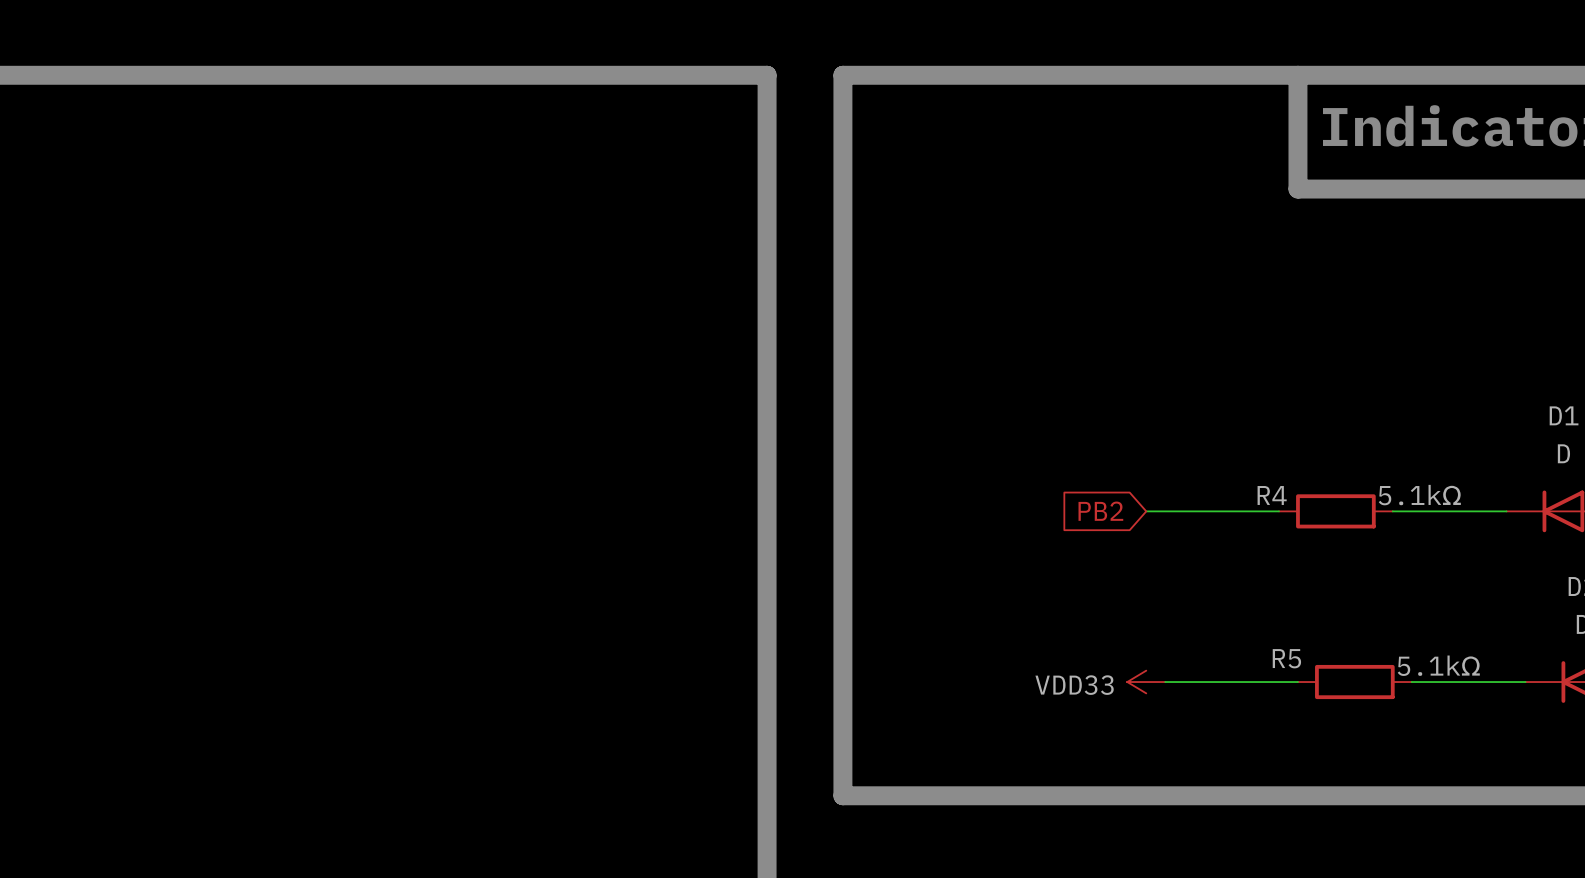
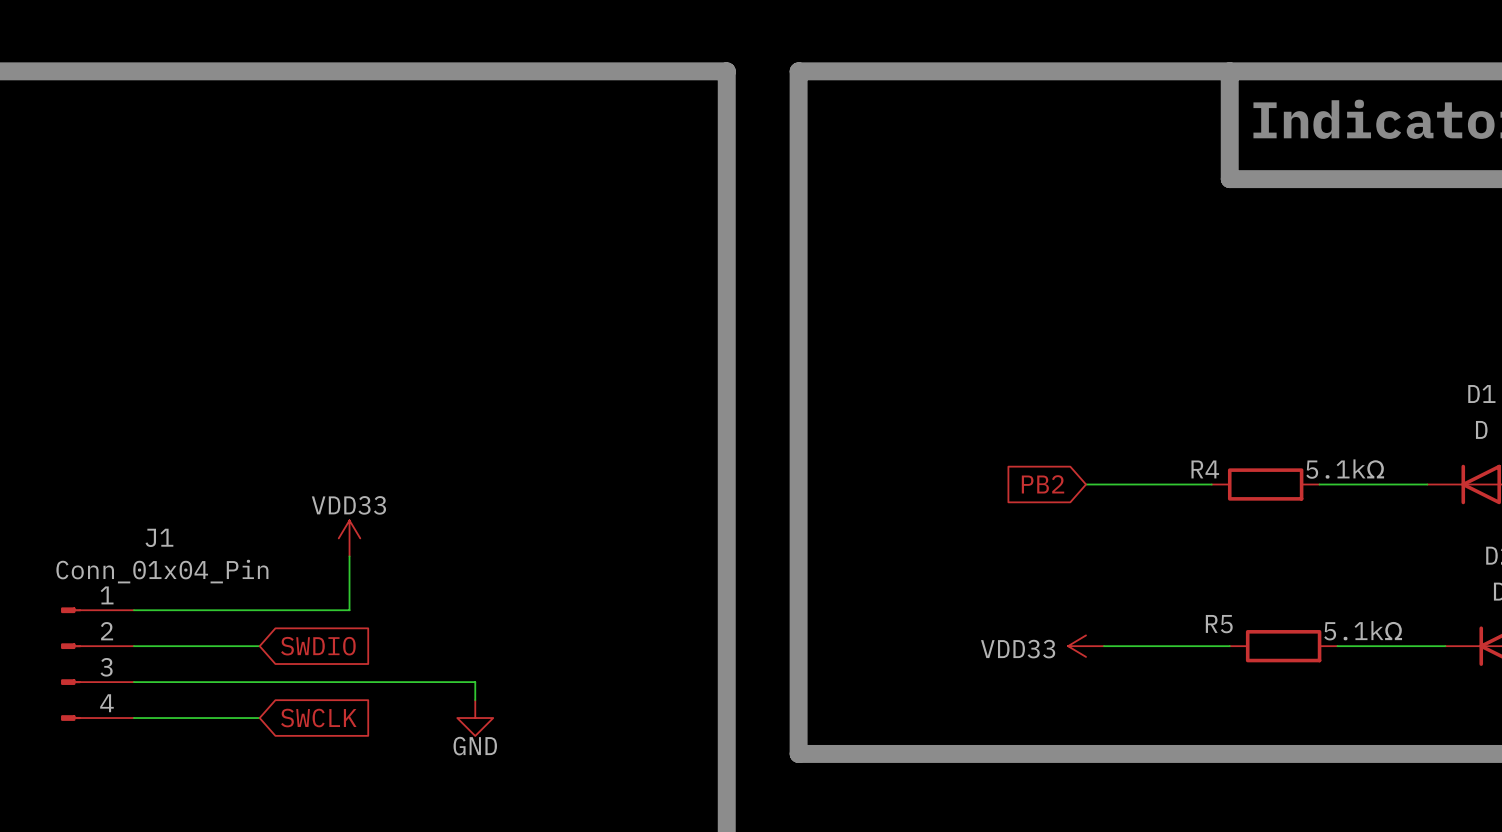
power symbol: none -> VDD33 (349, 538)
wire: none -> (349, 556) (349, 610) (133, 610)
wire: none -> (133, 646) (259, 646)
global label: none -> SWDIO (318, 646)
J1: none -> Conn_01x04_Pin (97, 664)
wire: none -> (133, 682) (475, 682) (475, 700)
wire: none -> (133, 718) (259, 718)
global label: none -> SWCLK (318, 718)
power symbol: none -> GND (475, 718)

